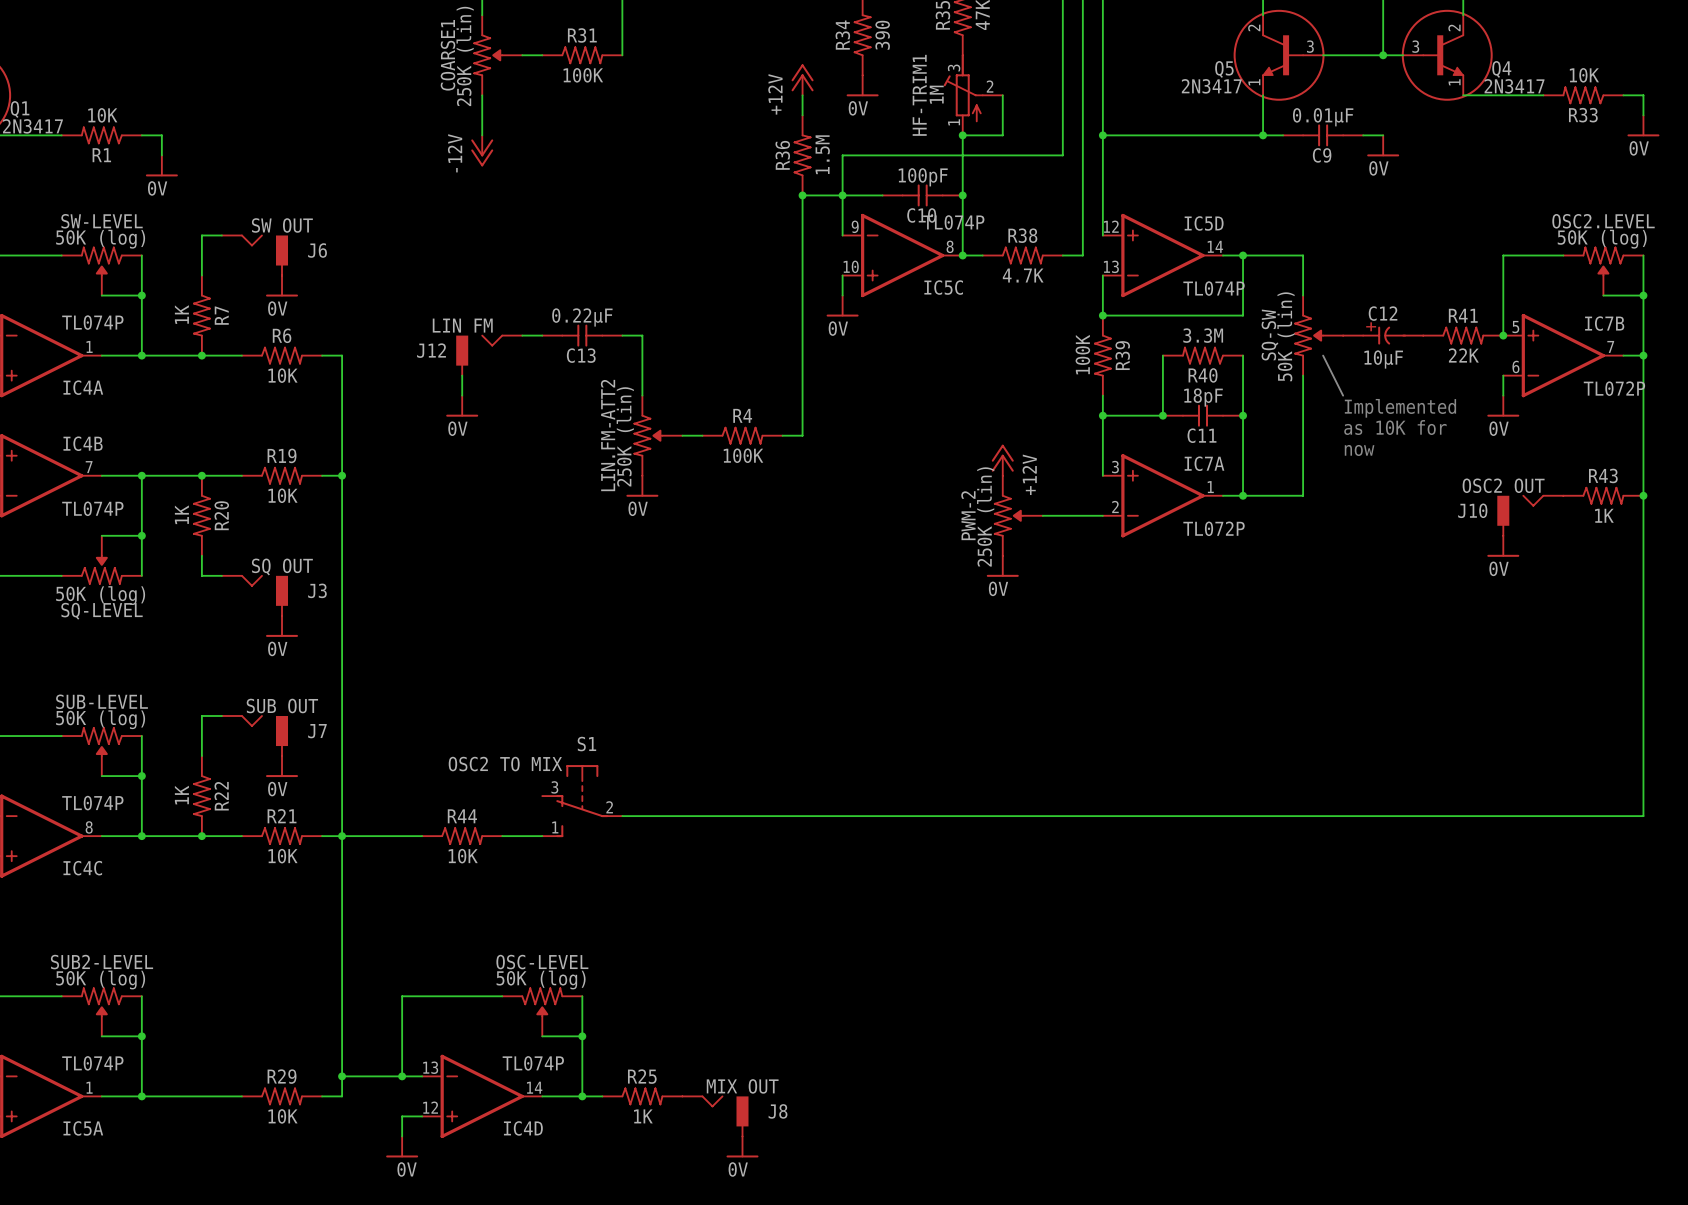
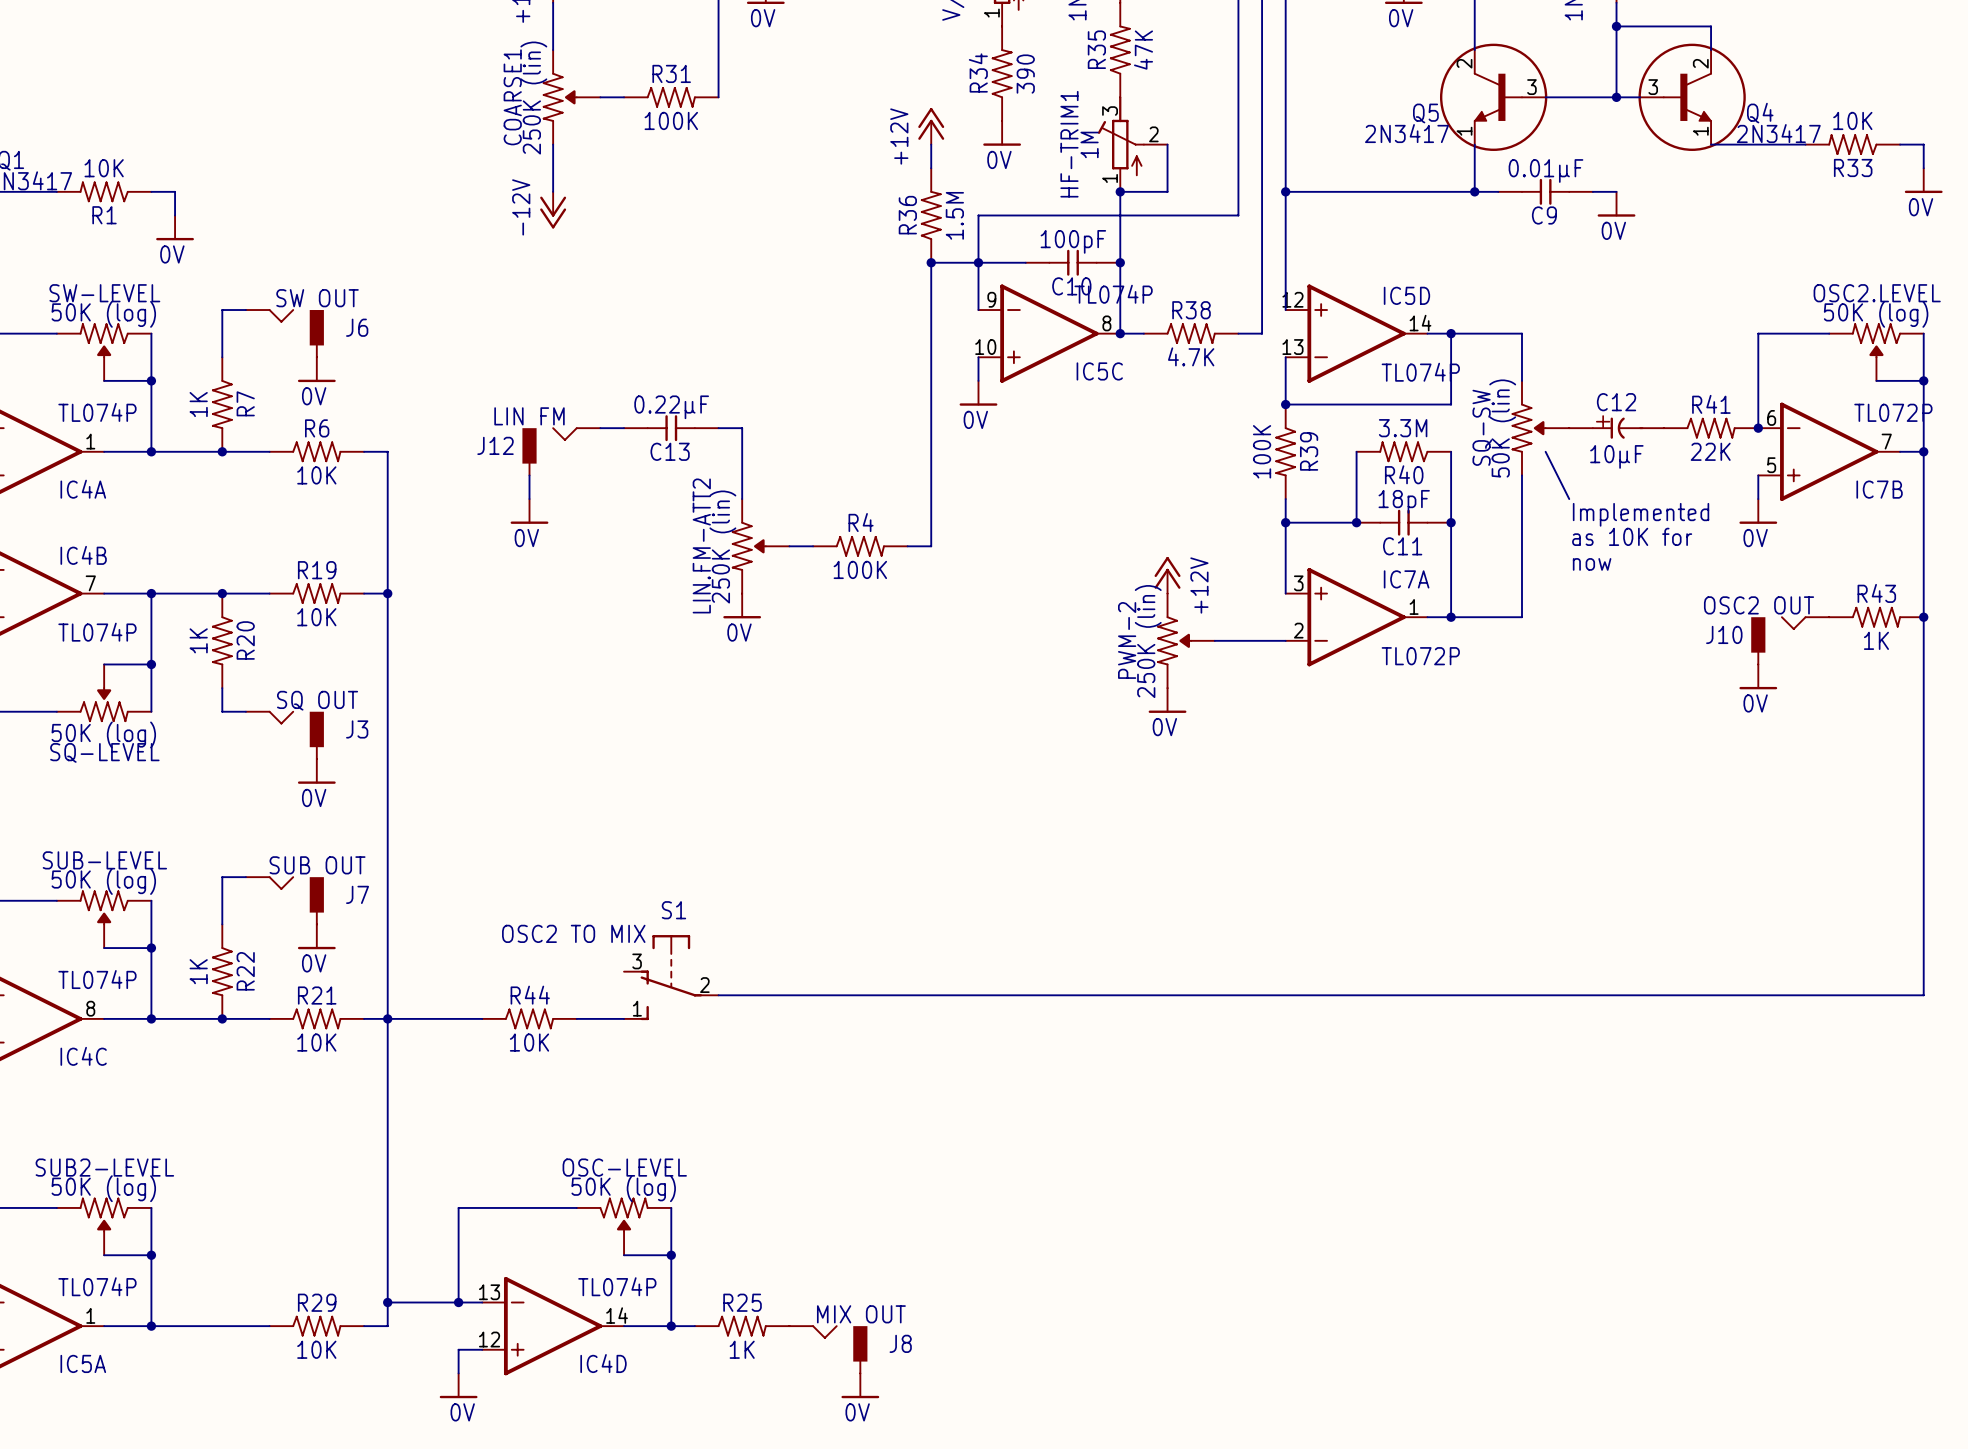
IC7B flip: as is (1563, 355) -> up-down (1829, 451)

